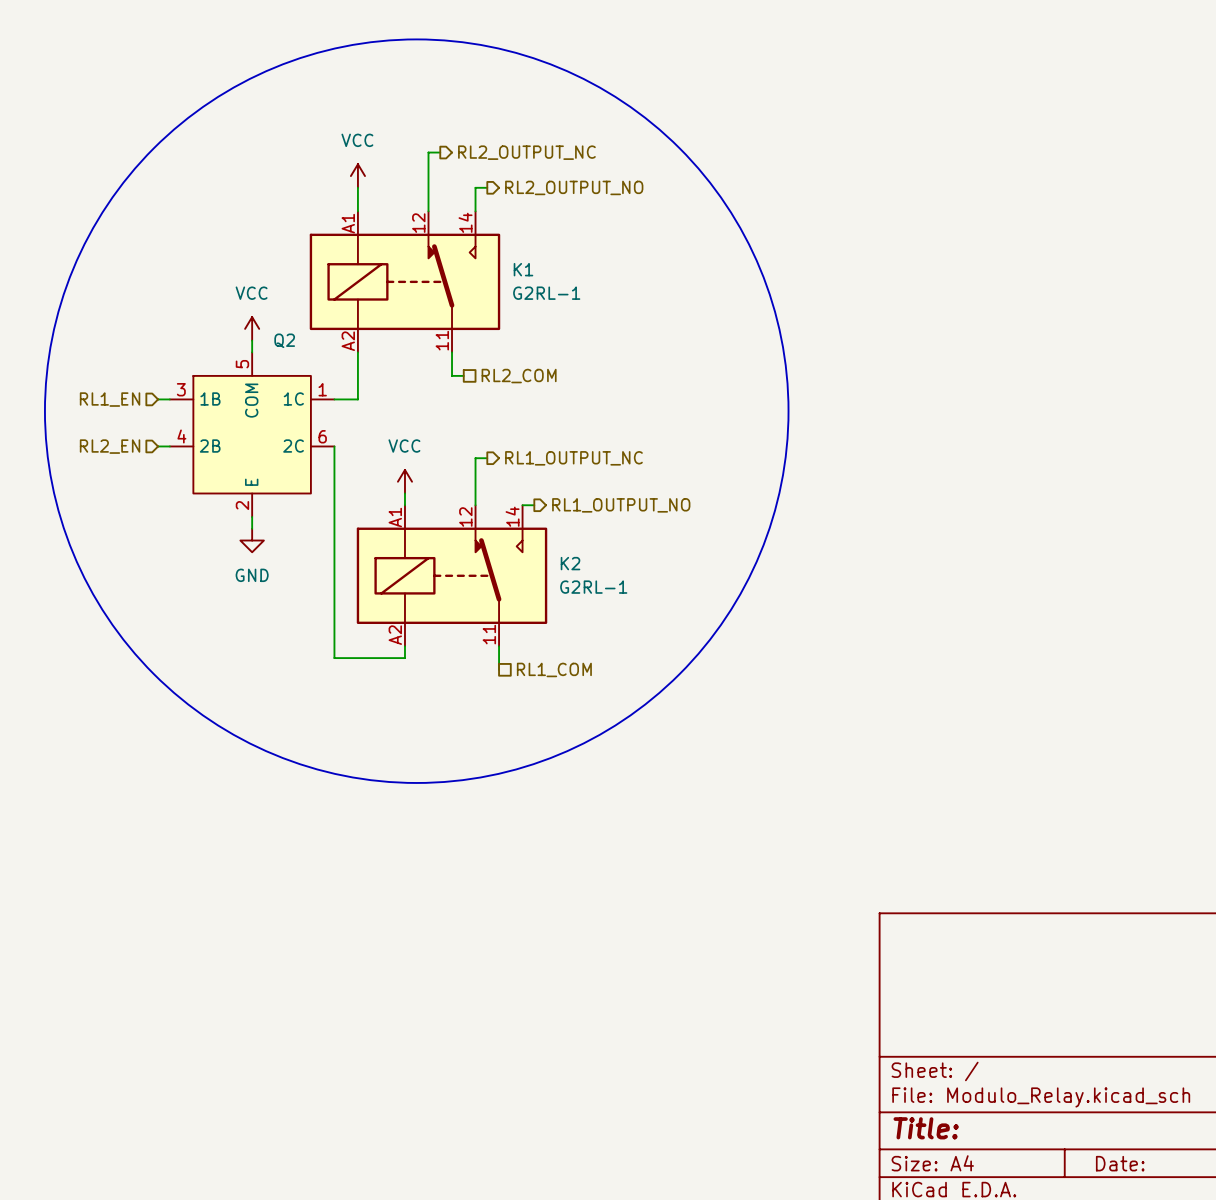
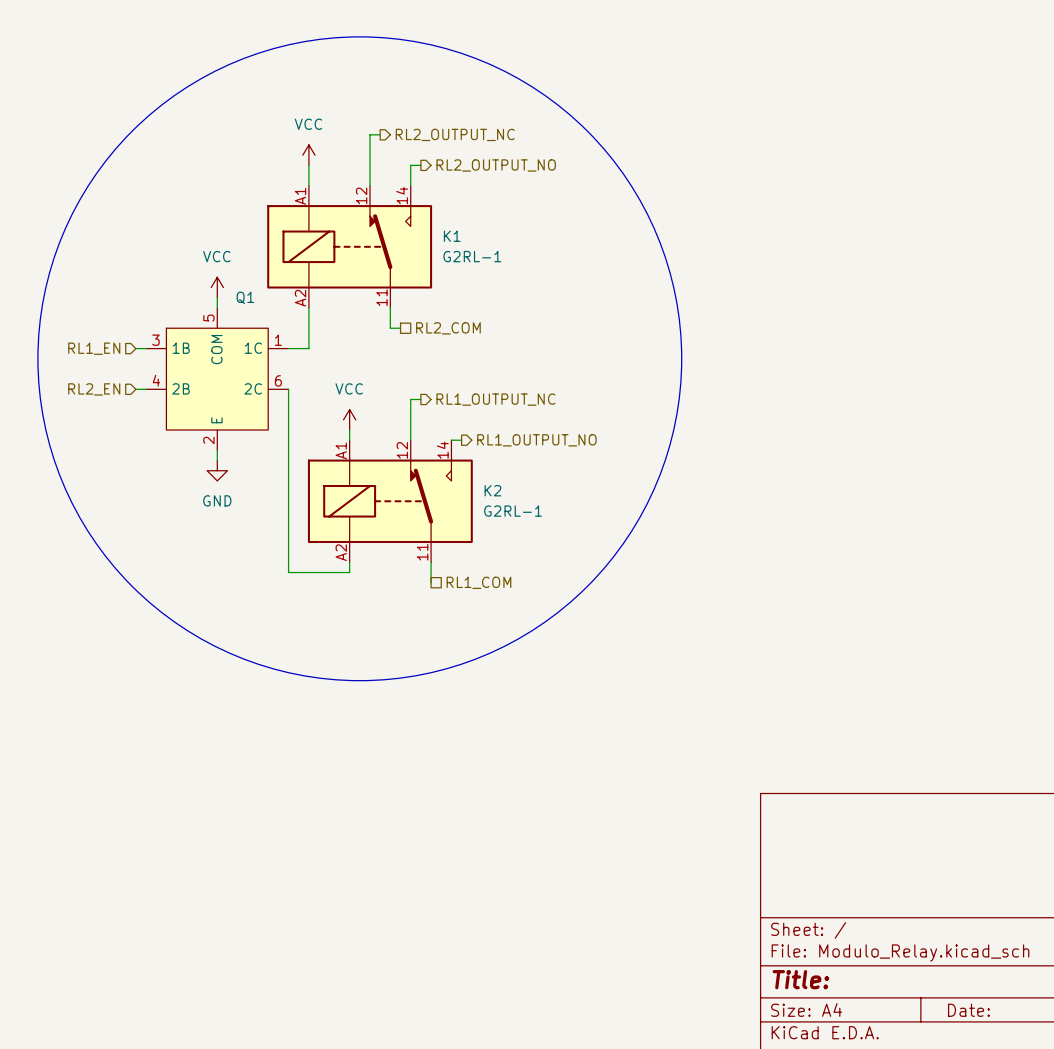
Q2 name: Q2 (284, 340) -> Q1 (245, 297)

